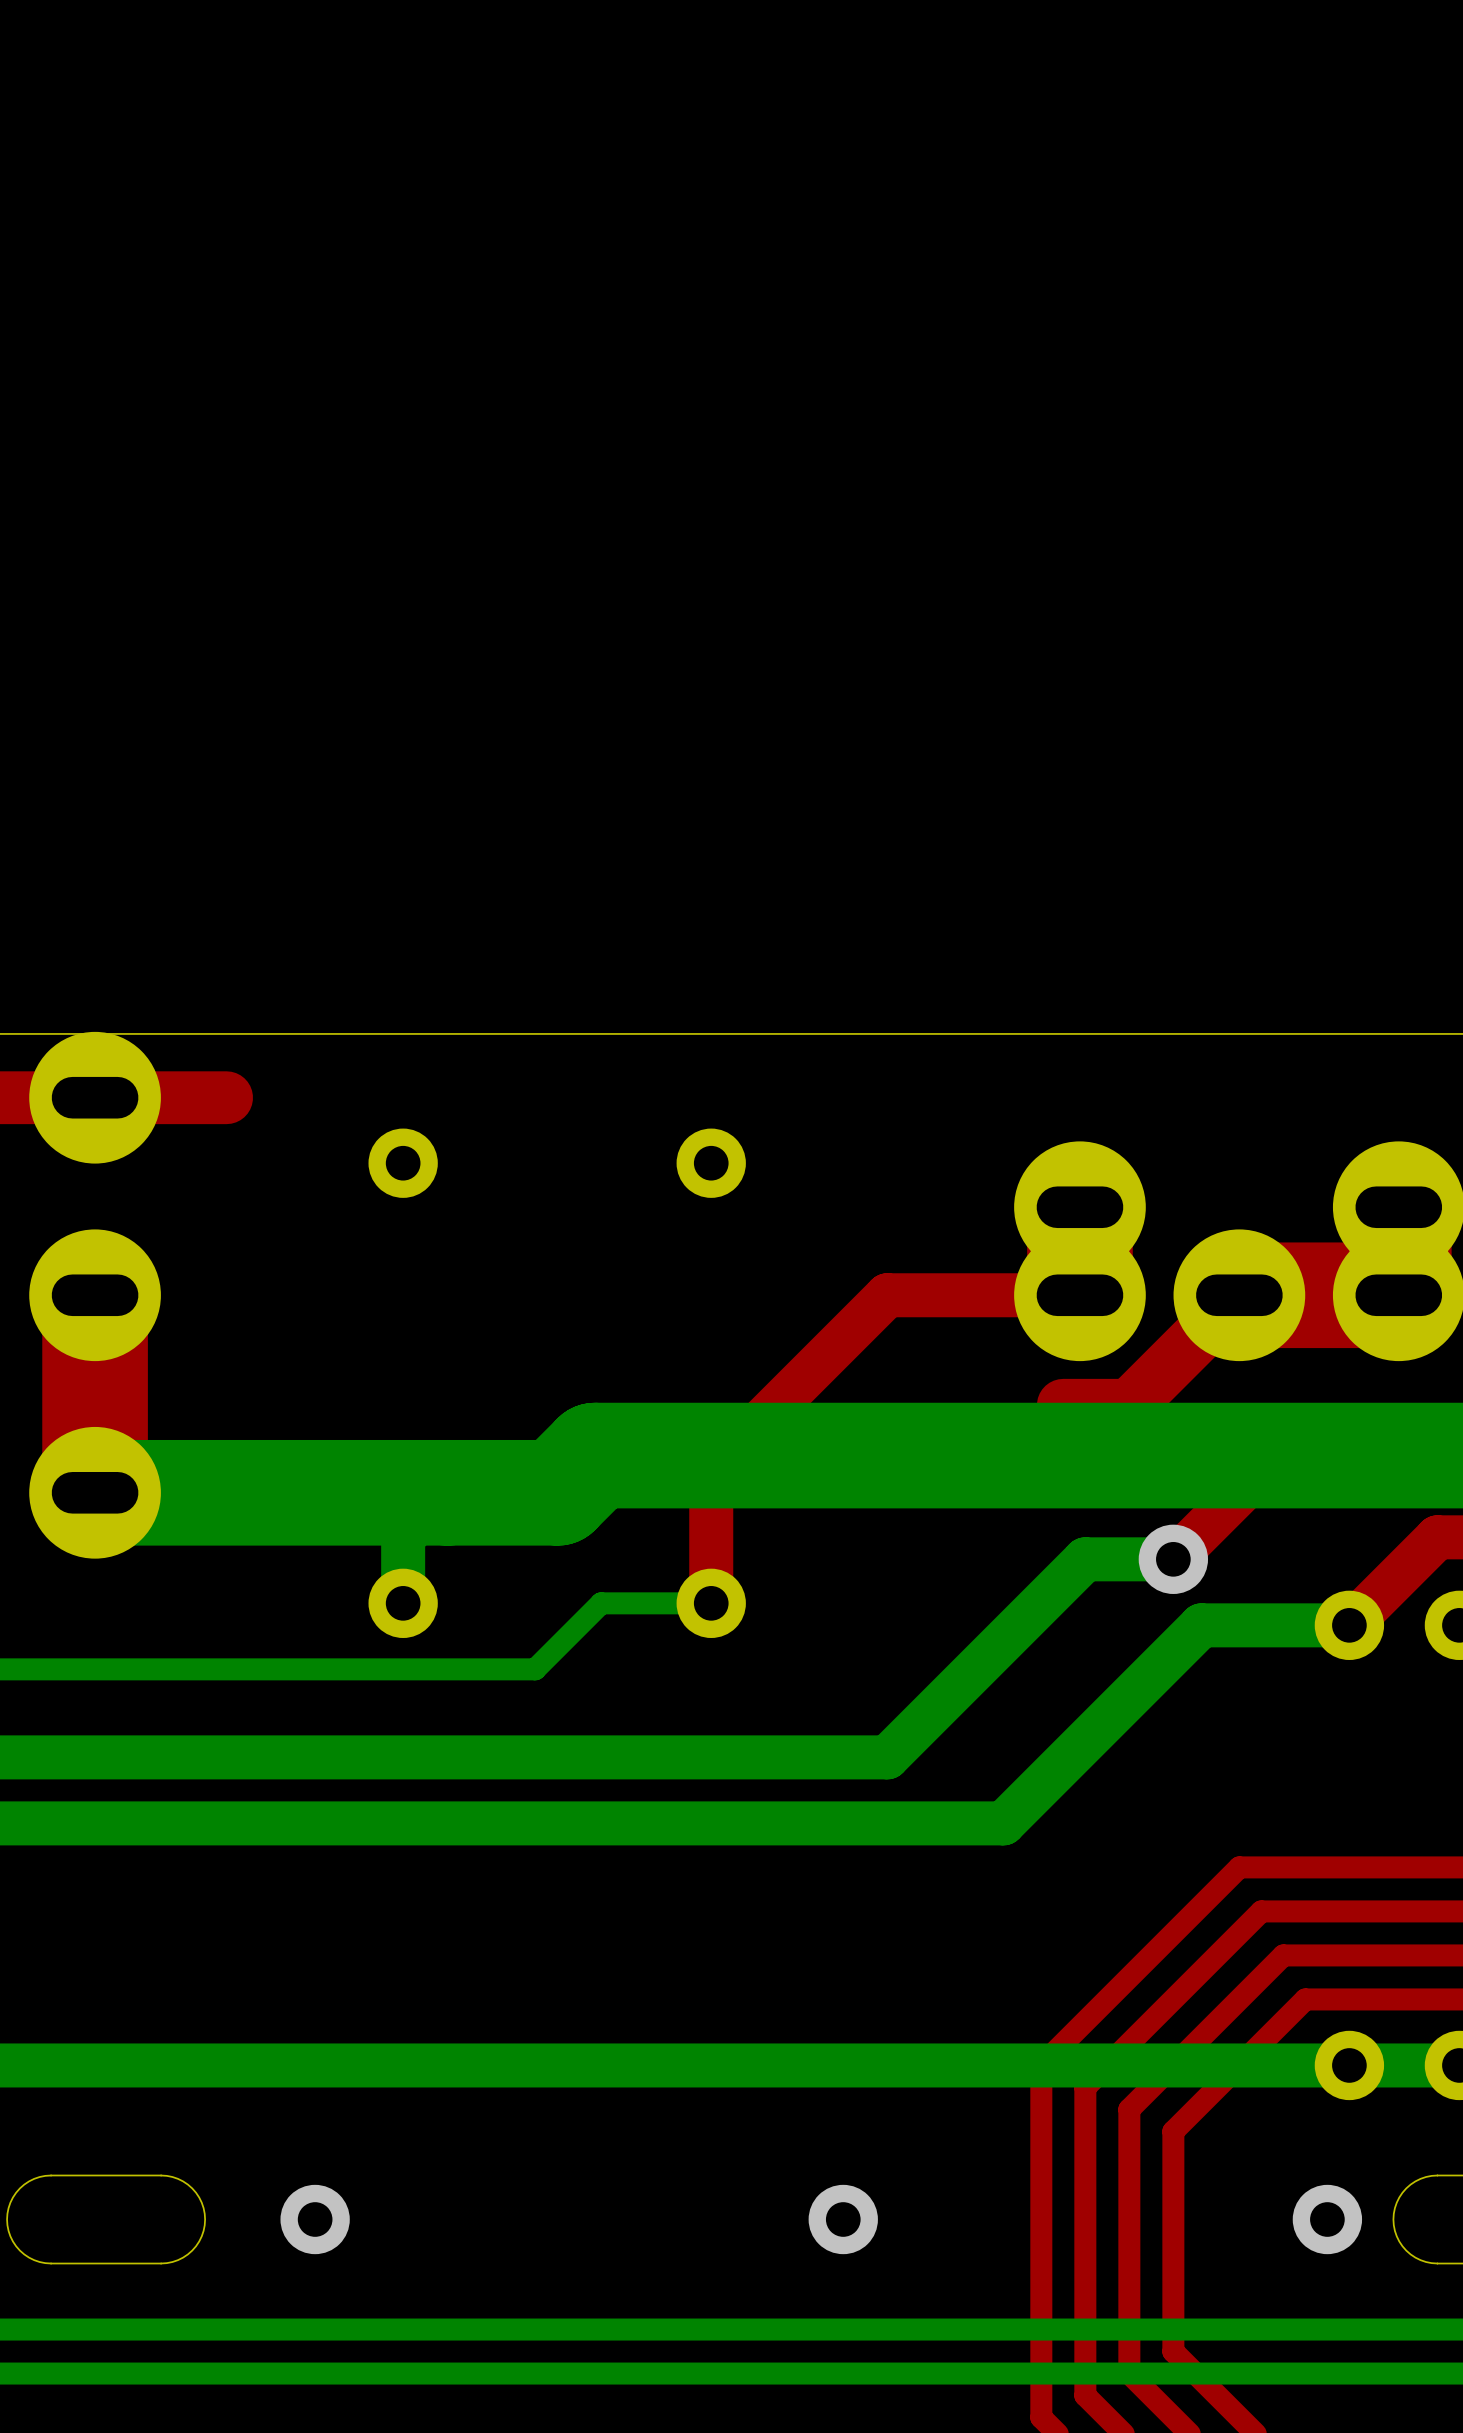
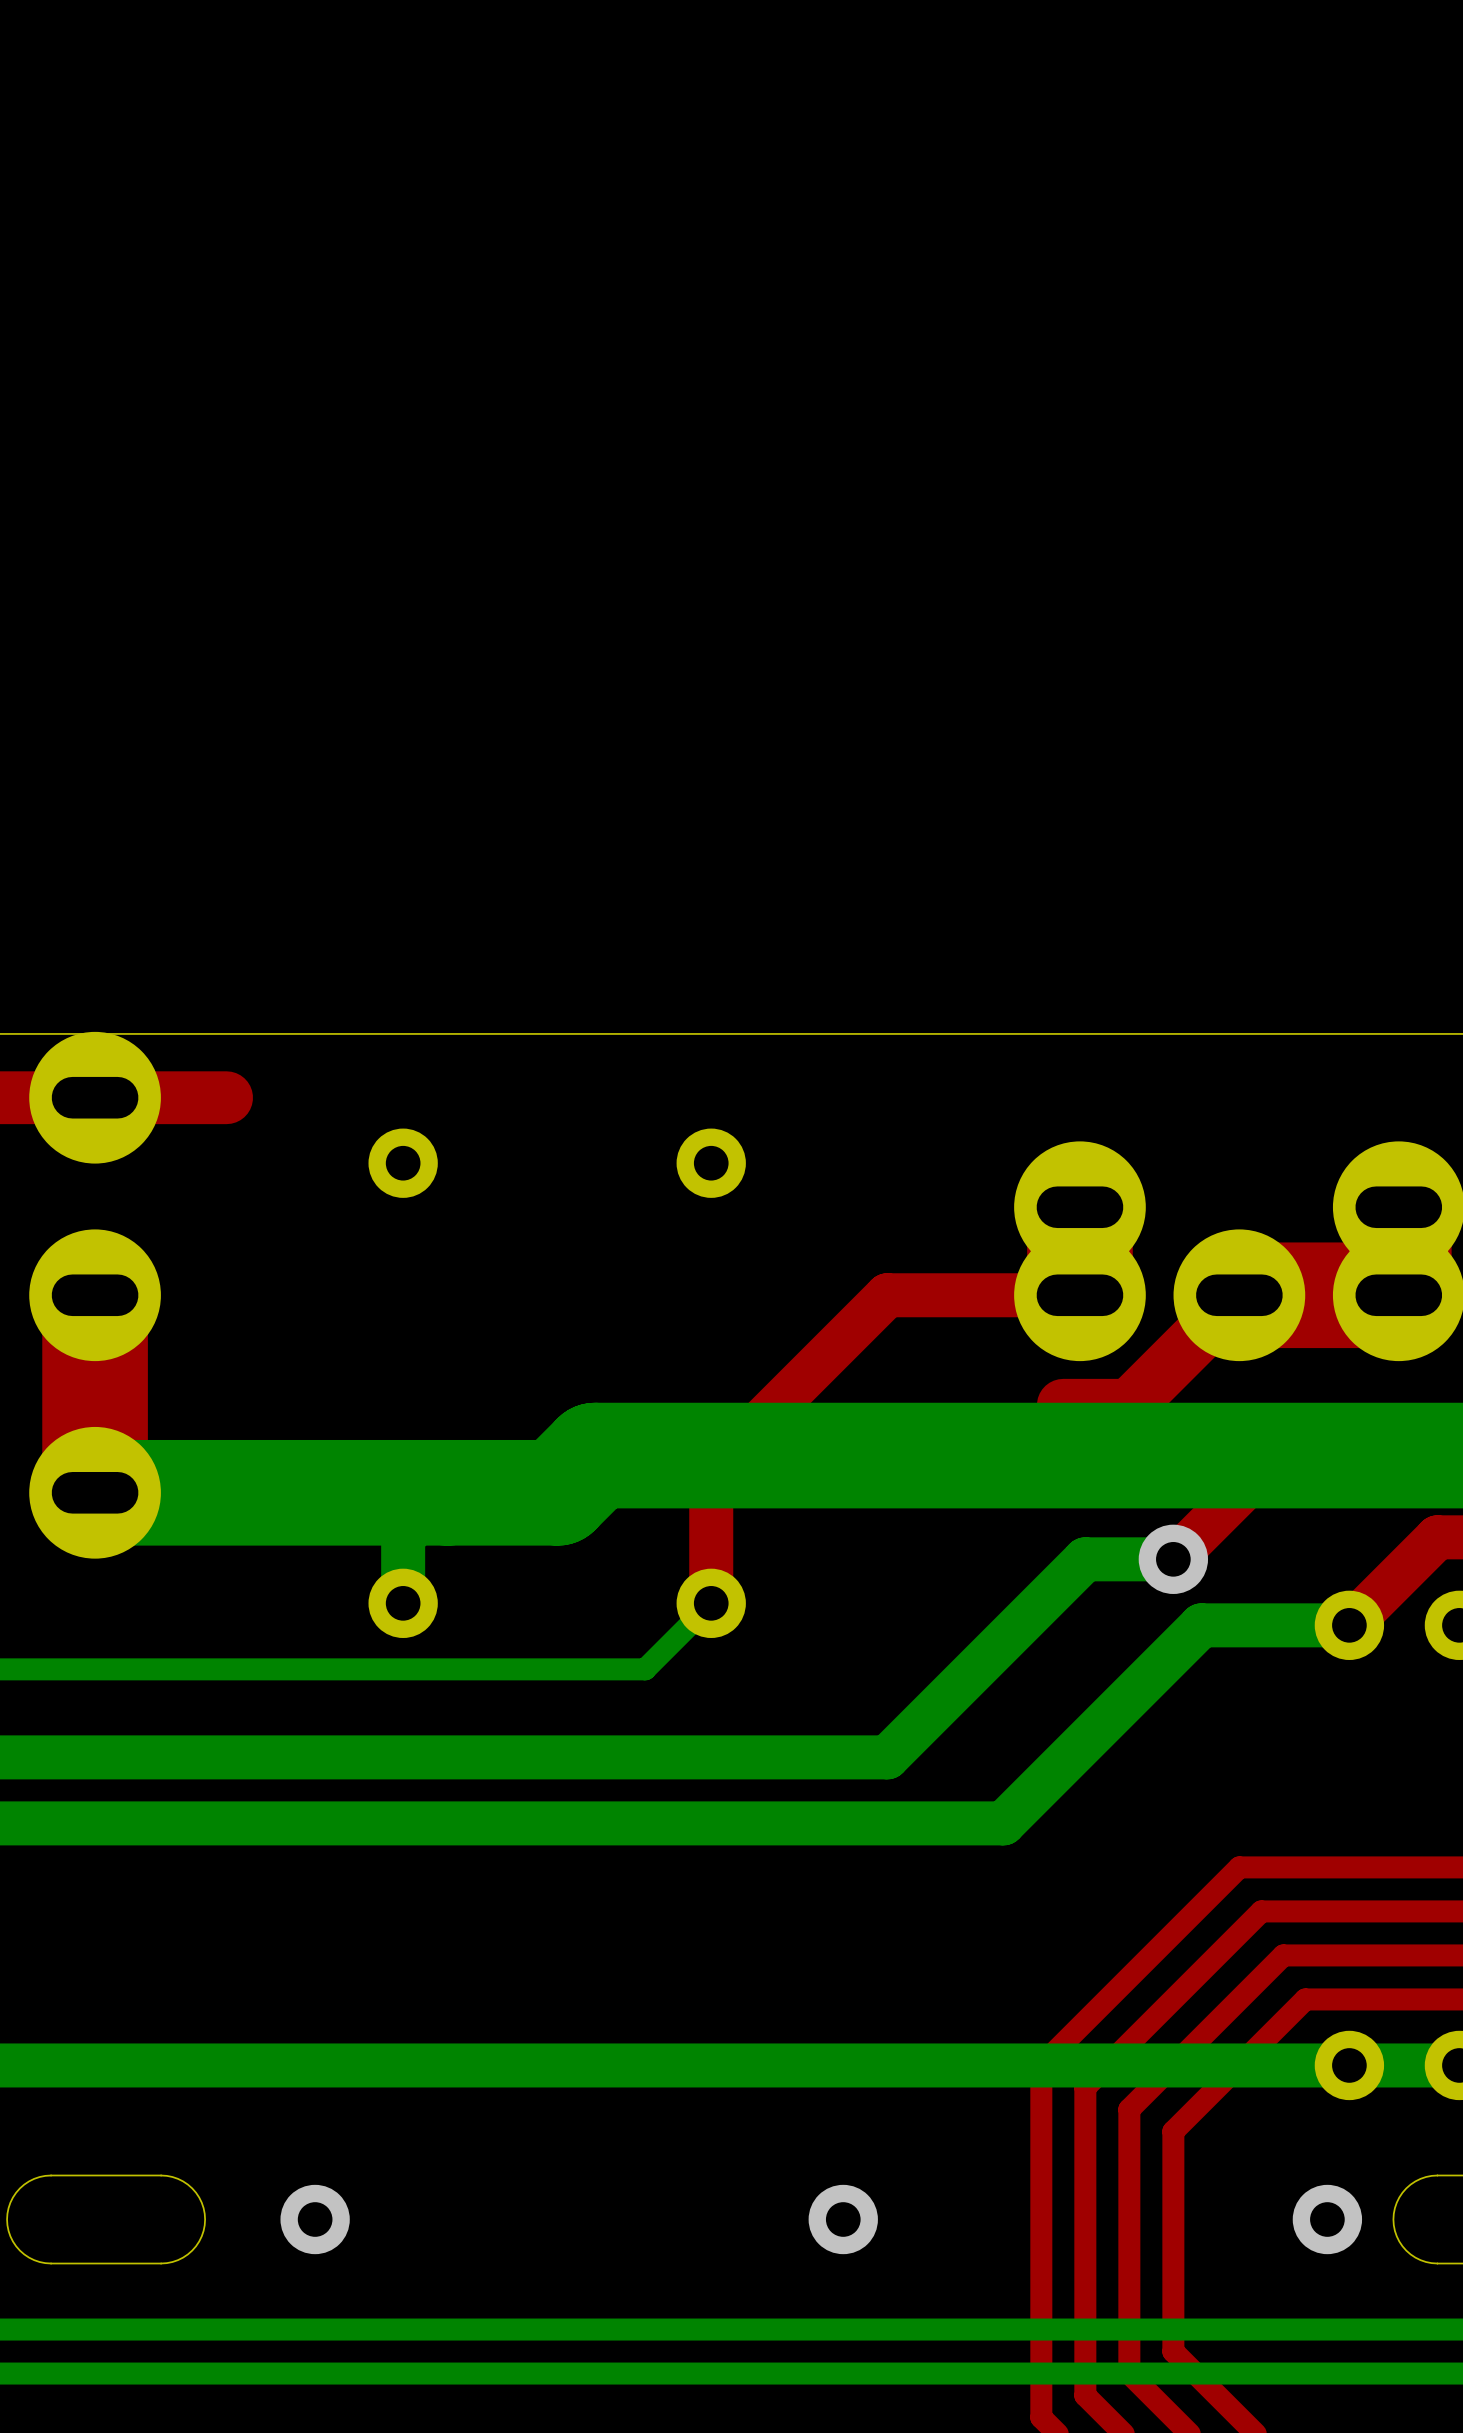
bottom track: (711, 1603) (601, 1603) (535, 1669) -> (711, 1603) (645, 1669) (535, 1669)

